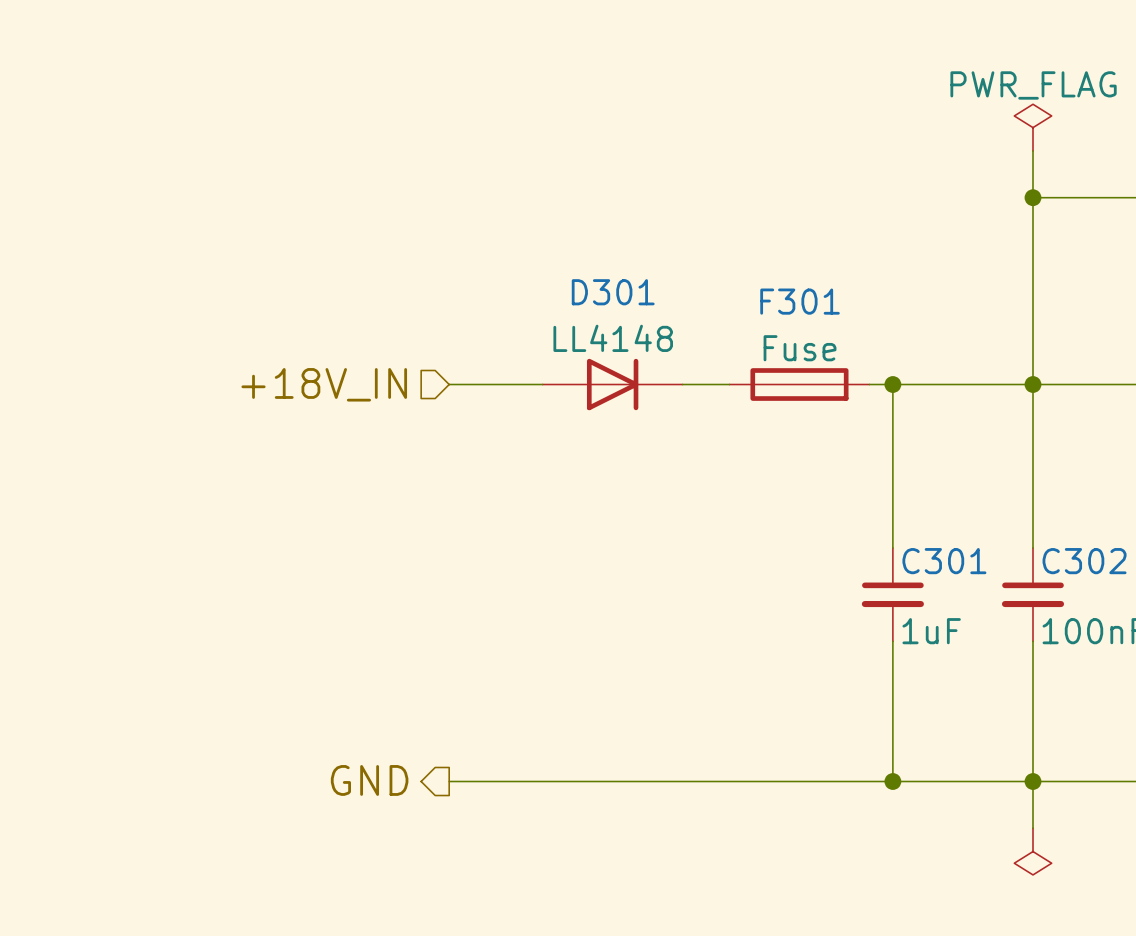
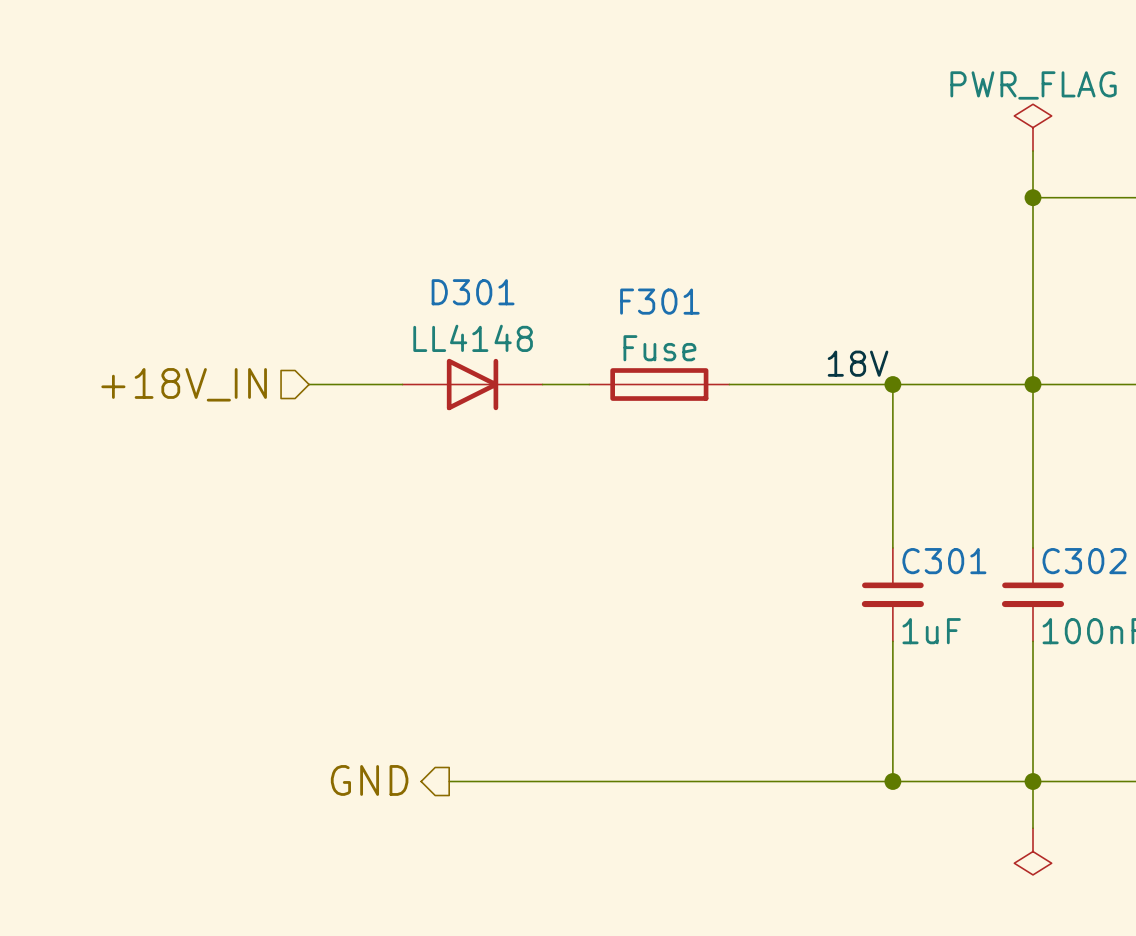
label: none -> 18V (858, 363)
wire: none -> (309, 384) (402, 384)
hierarchical label position: +18V_IN (324, 384) -> +18V_IN (184, 384)
D301 position: (612, 384) -> (472, 384)
F301 position: (799, 384) -> (659, 384)

